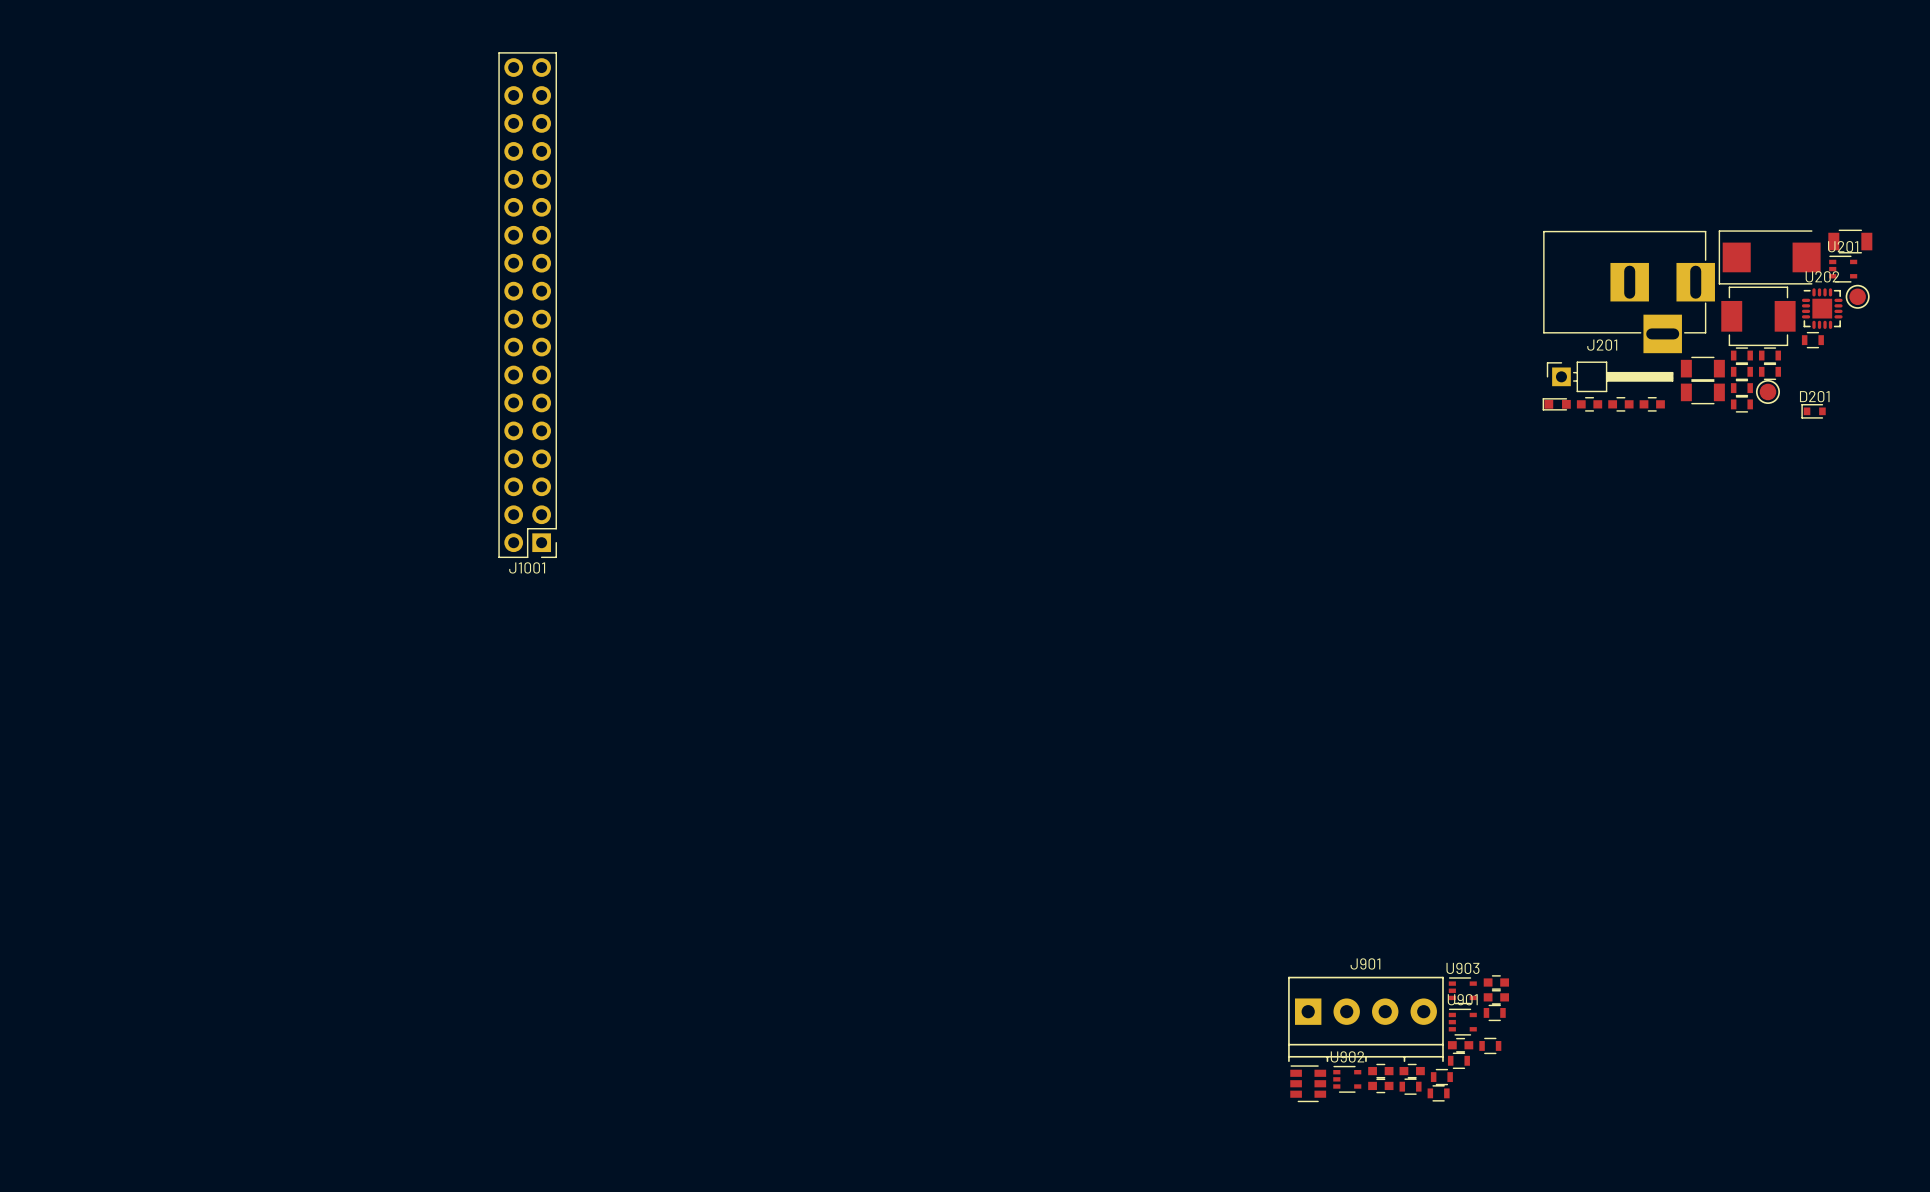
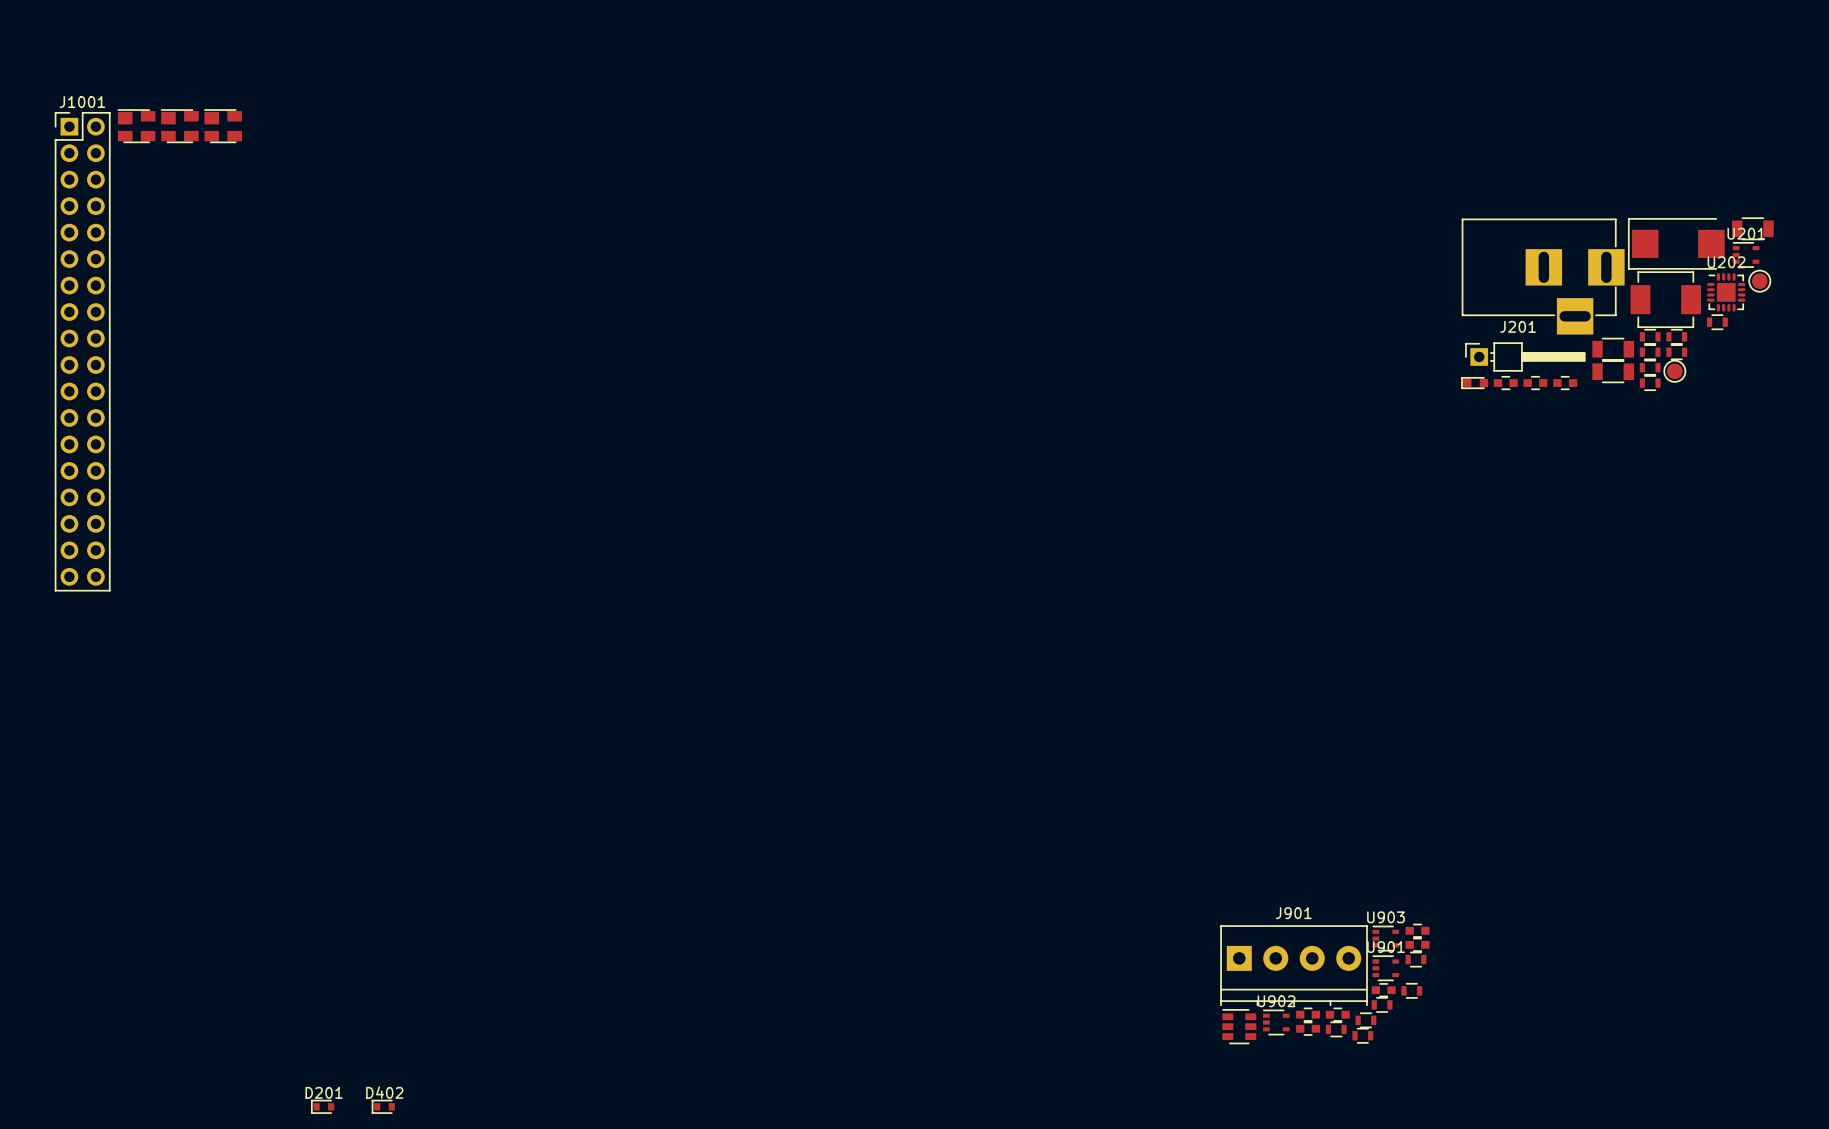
part: none -> (136, 126)
part: none -> (179, 126)
part: none -> (223, 126)
J1001 rotation: 0° (527, 305) -> 180° (82, 351)
J1001 position: (527, 305) -> (82, 351)
D201 position: (1813, 411) -> (322, 1106)
D402: none -> (383, 1106)

